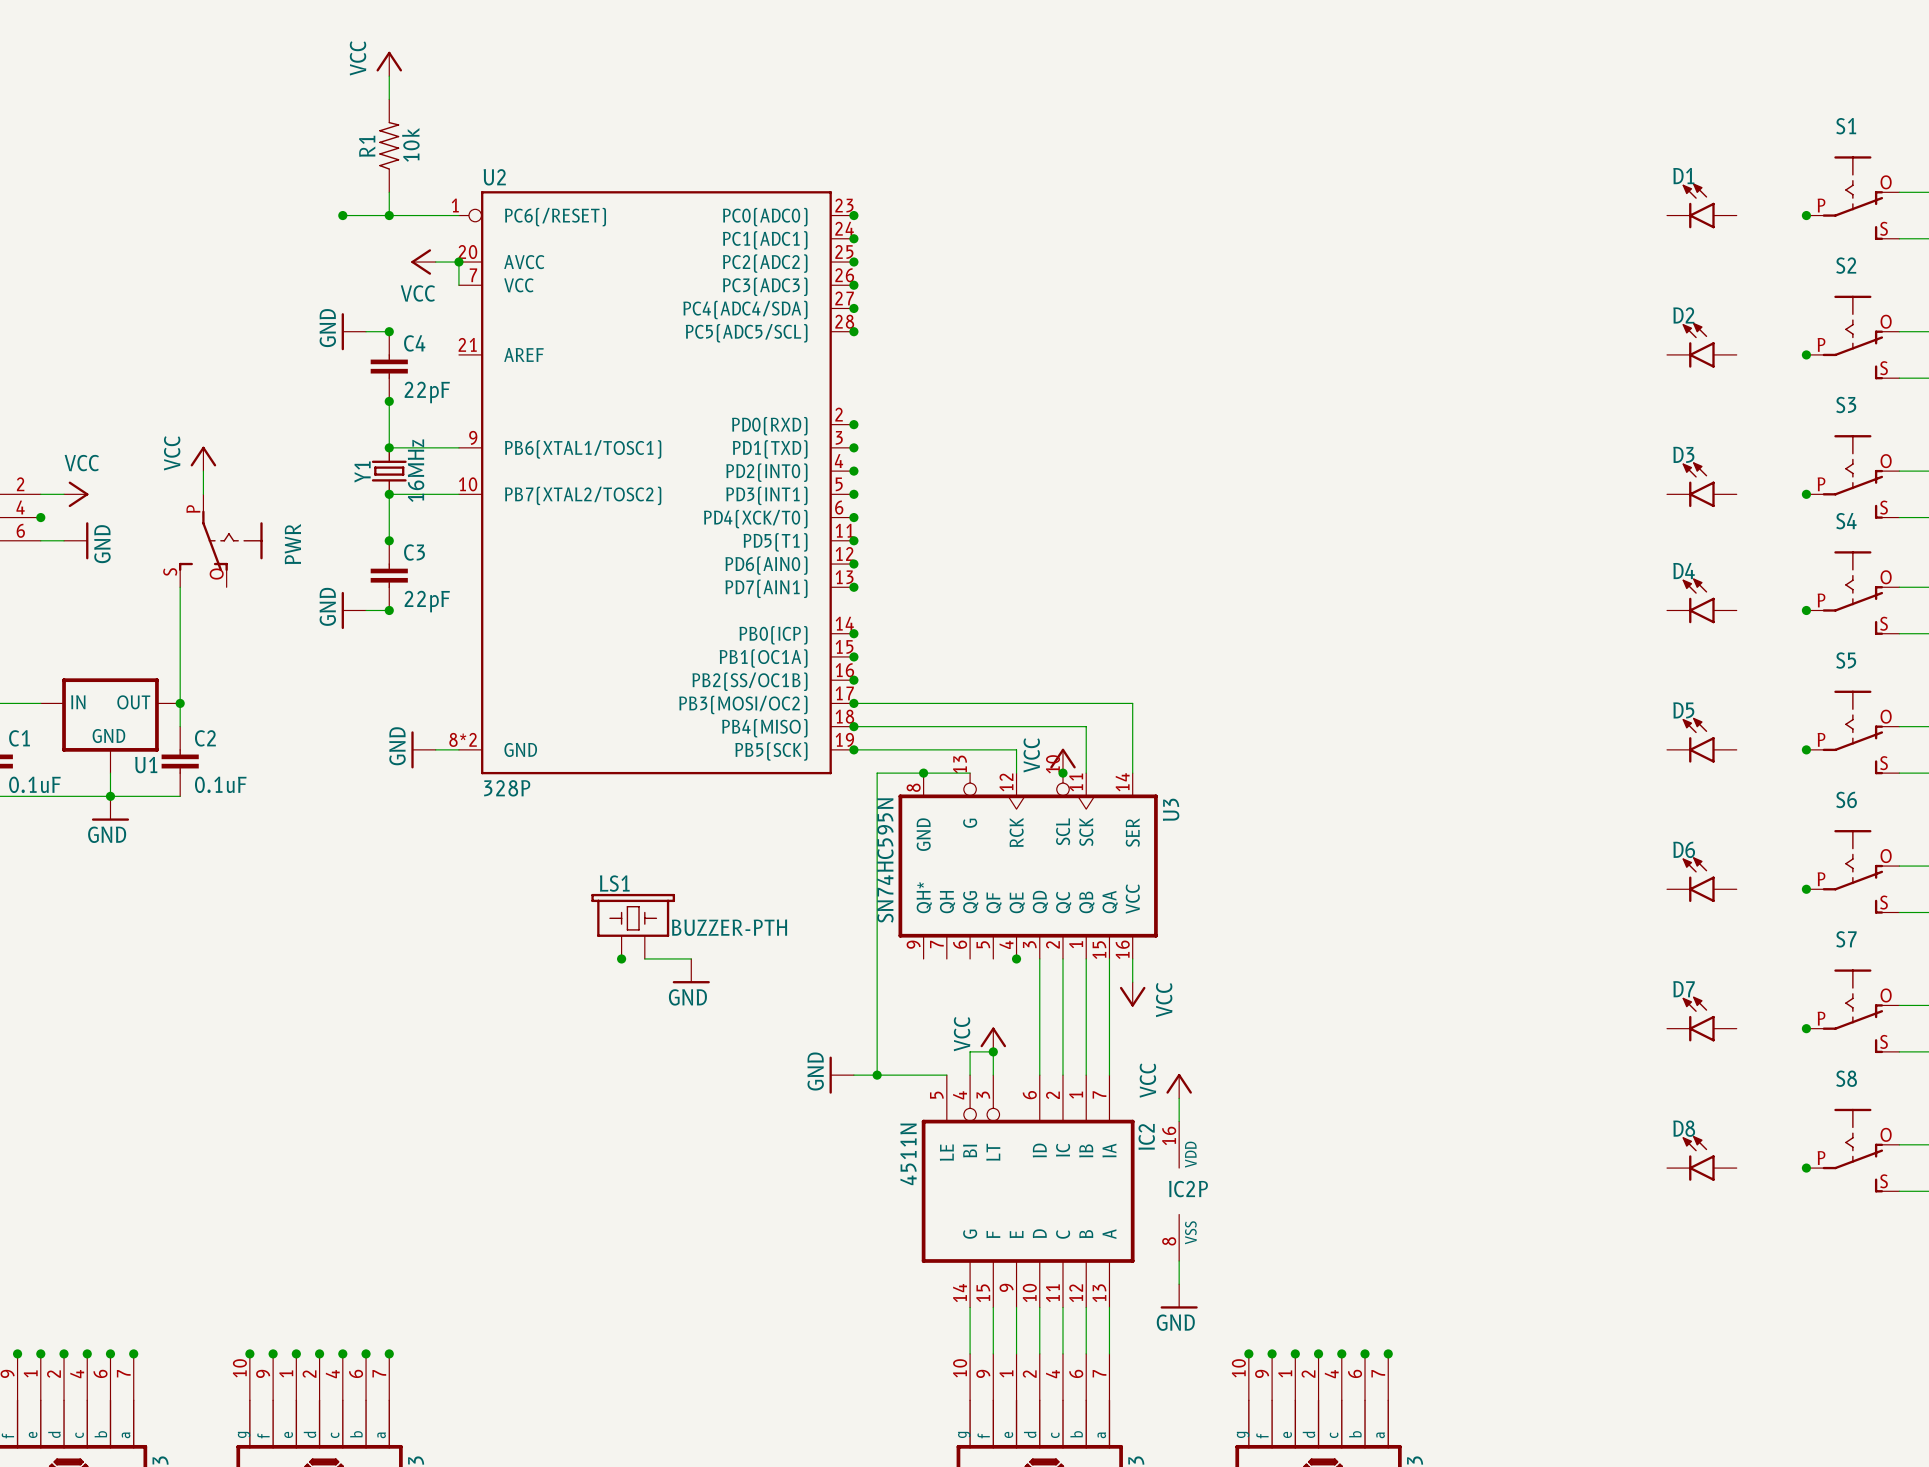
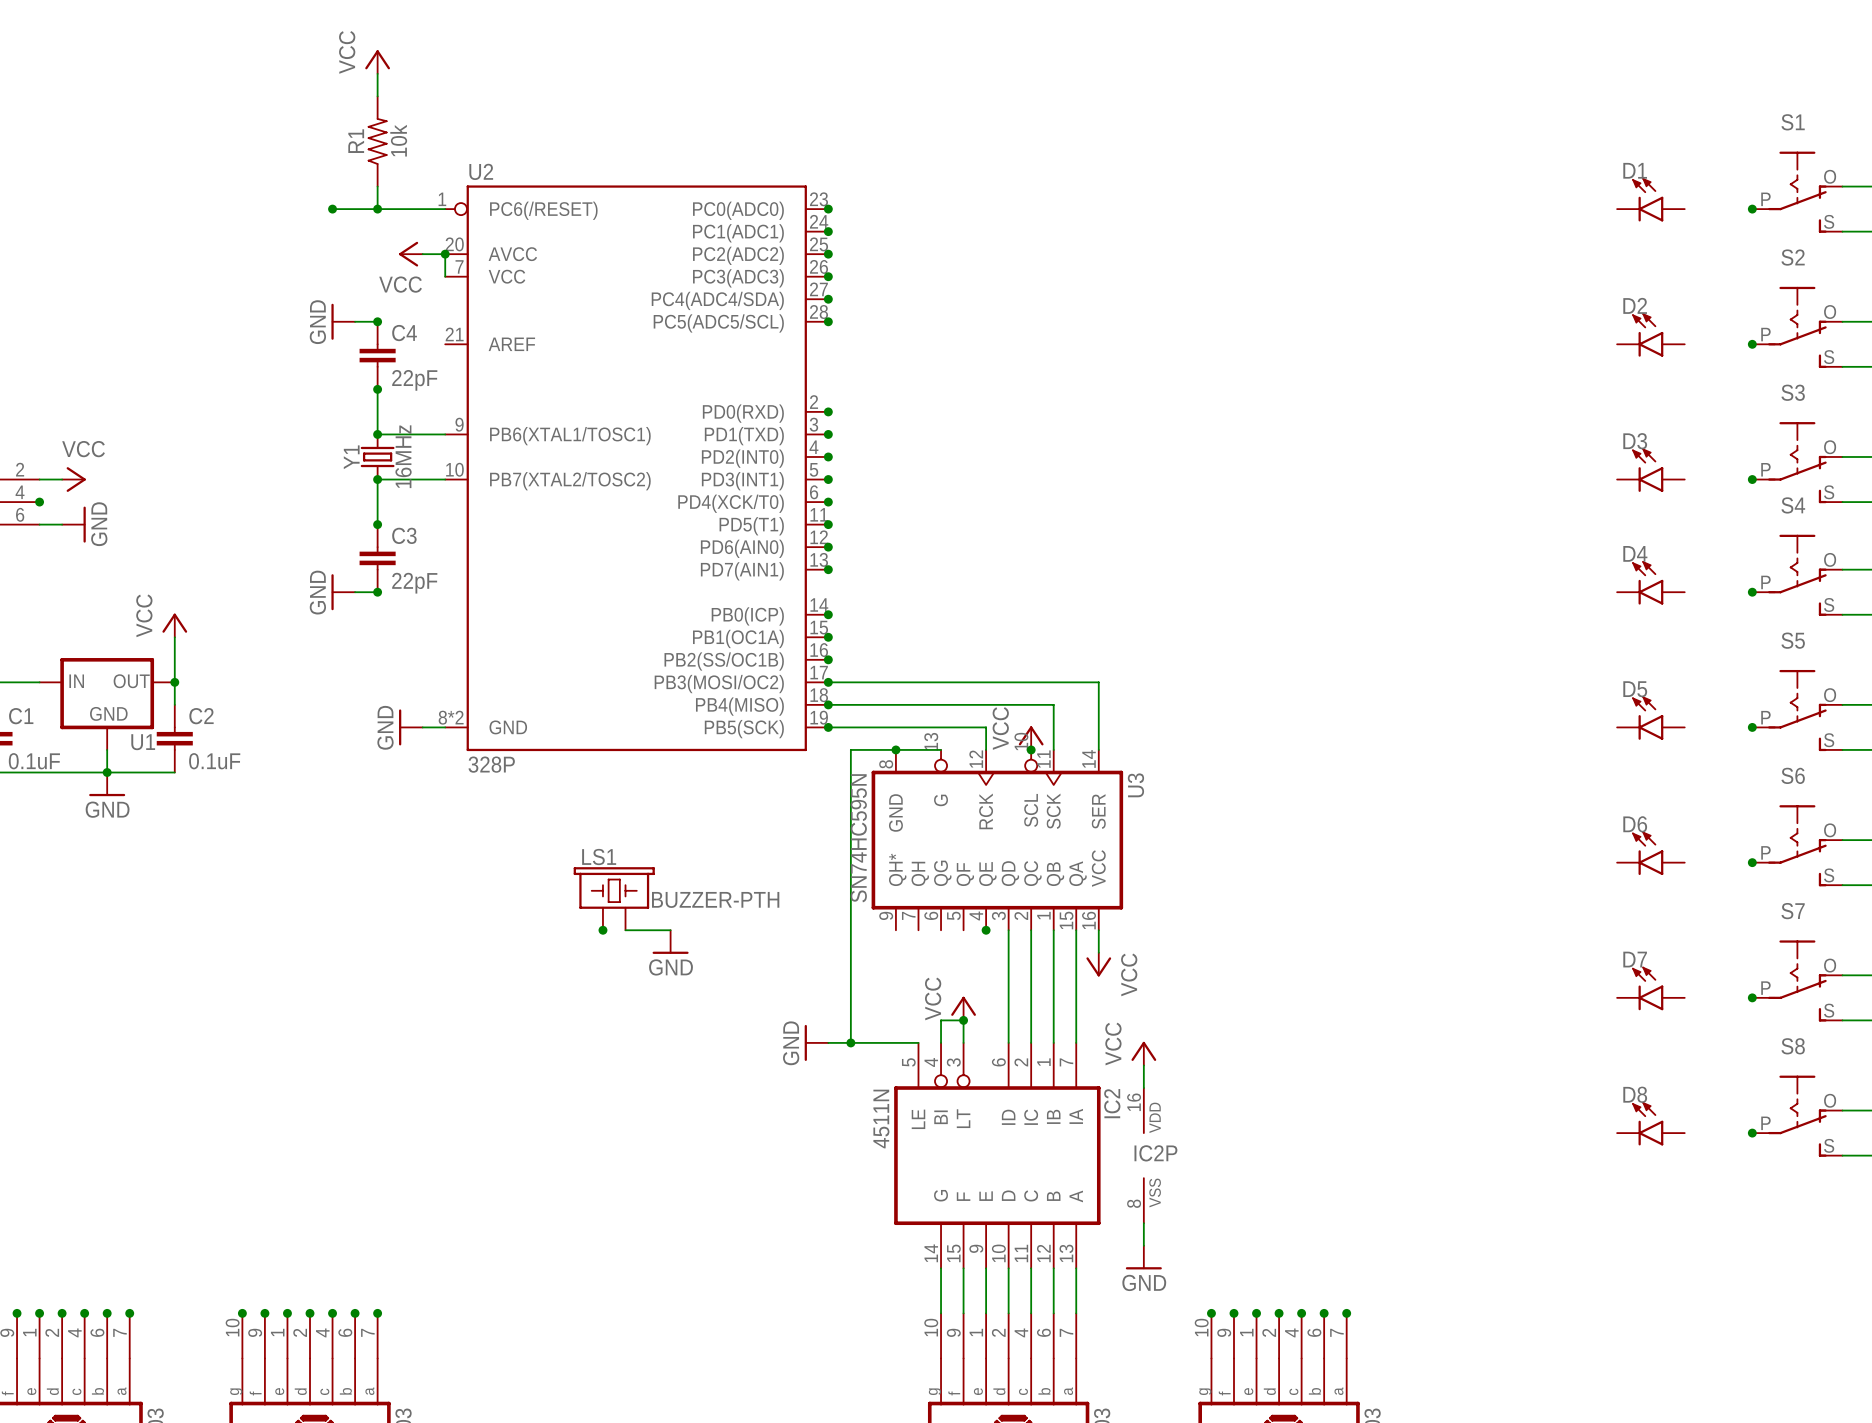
power symbol position: VCC (203, 458) -> VCC (174, 625)
wire: (203, 471) (203, 494) -> none
PWR: (220, 540) -> none
wire: (180, 587) (180, 656) -> none

